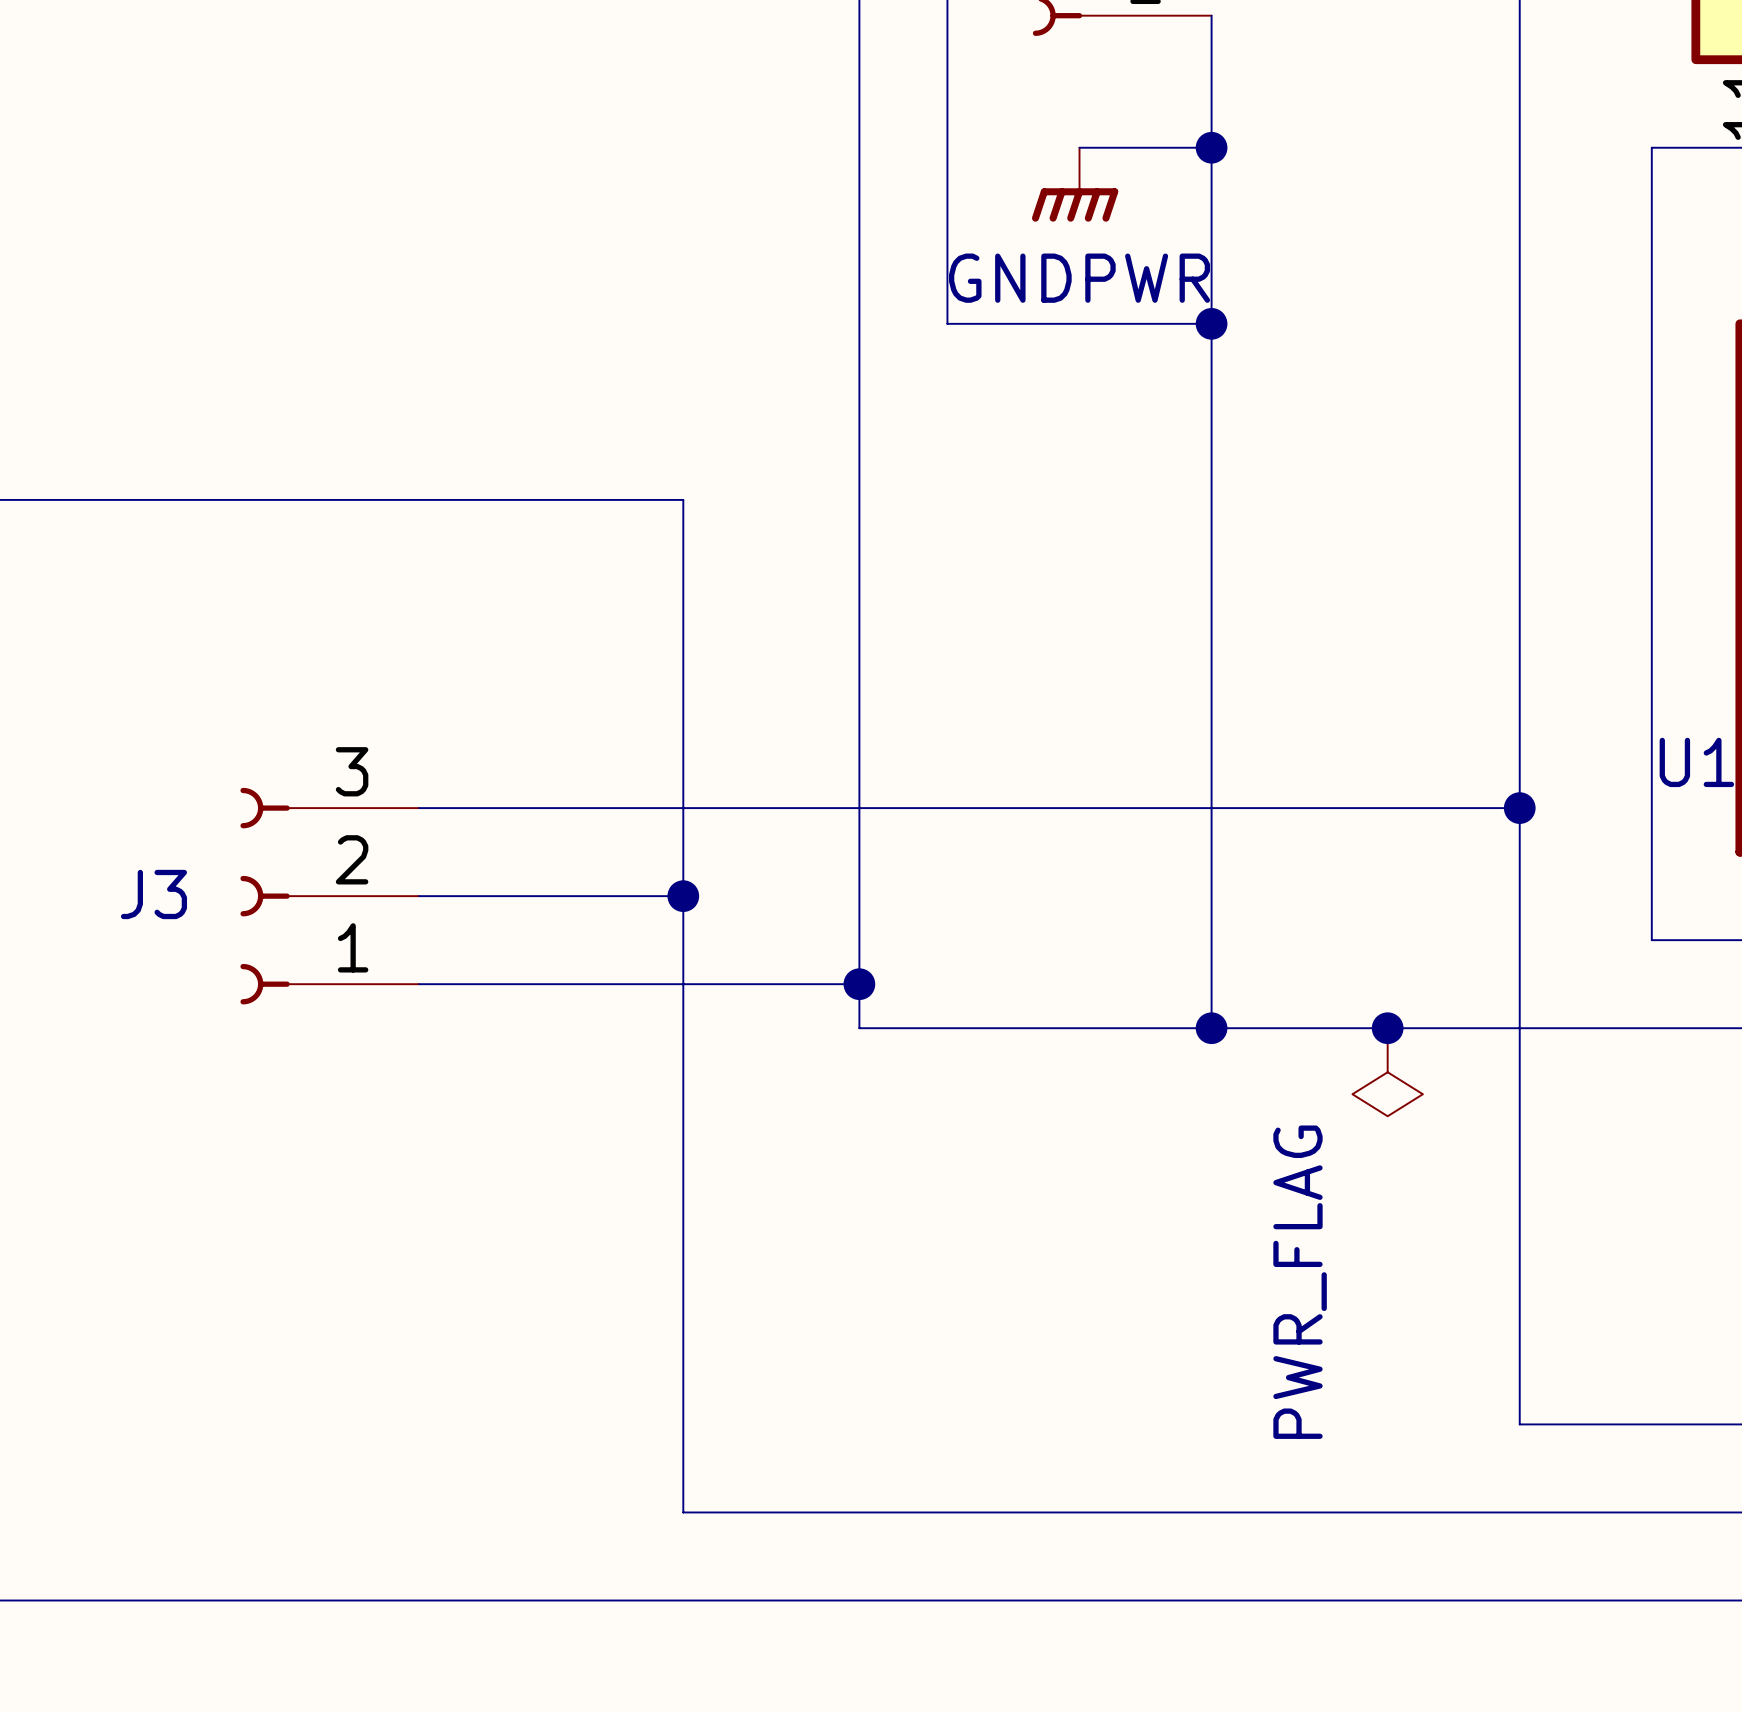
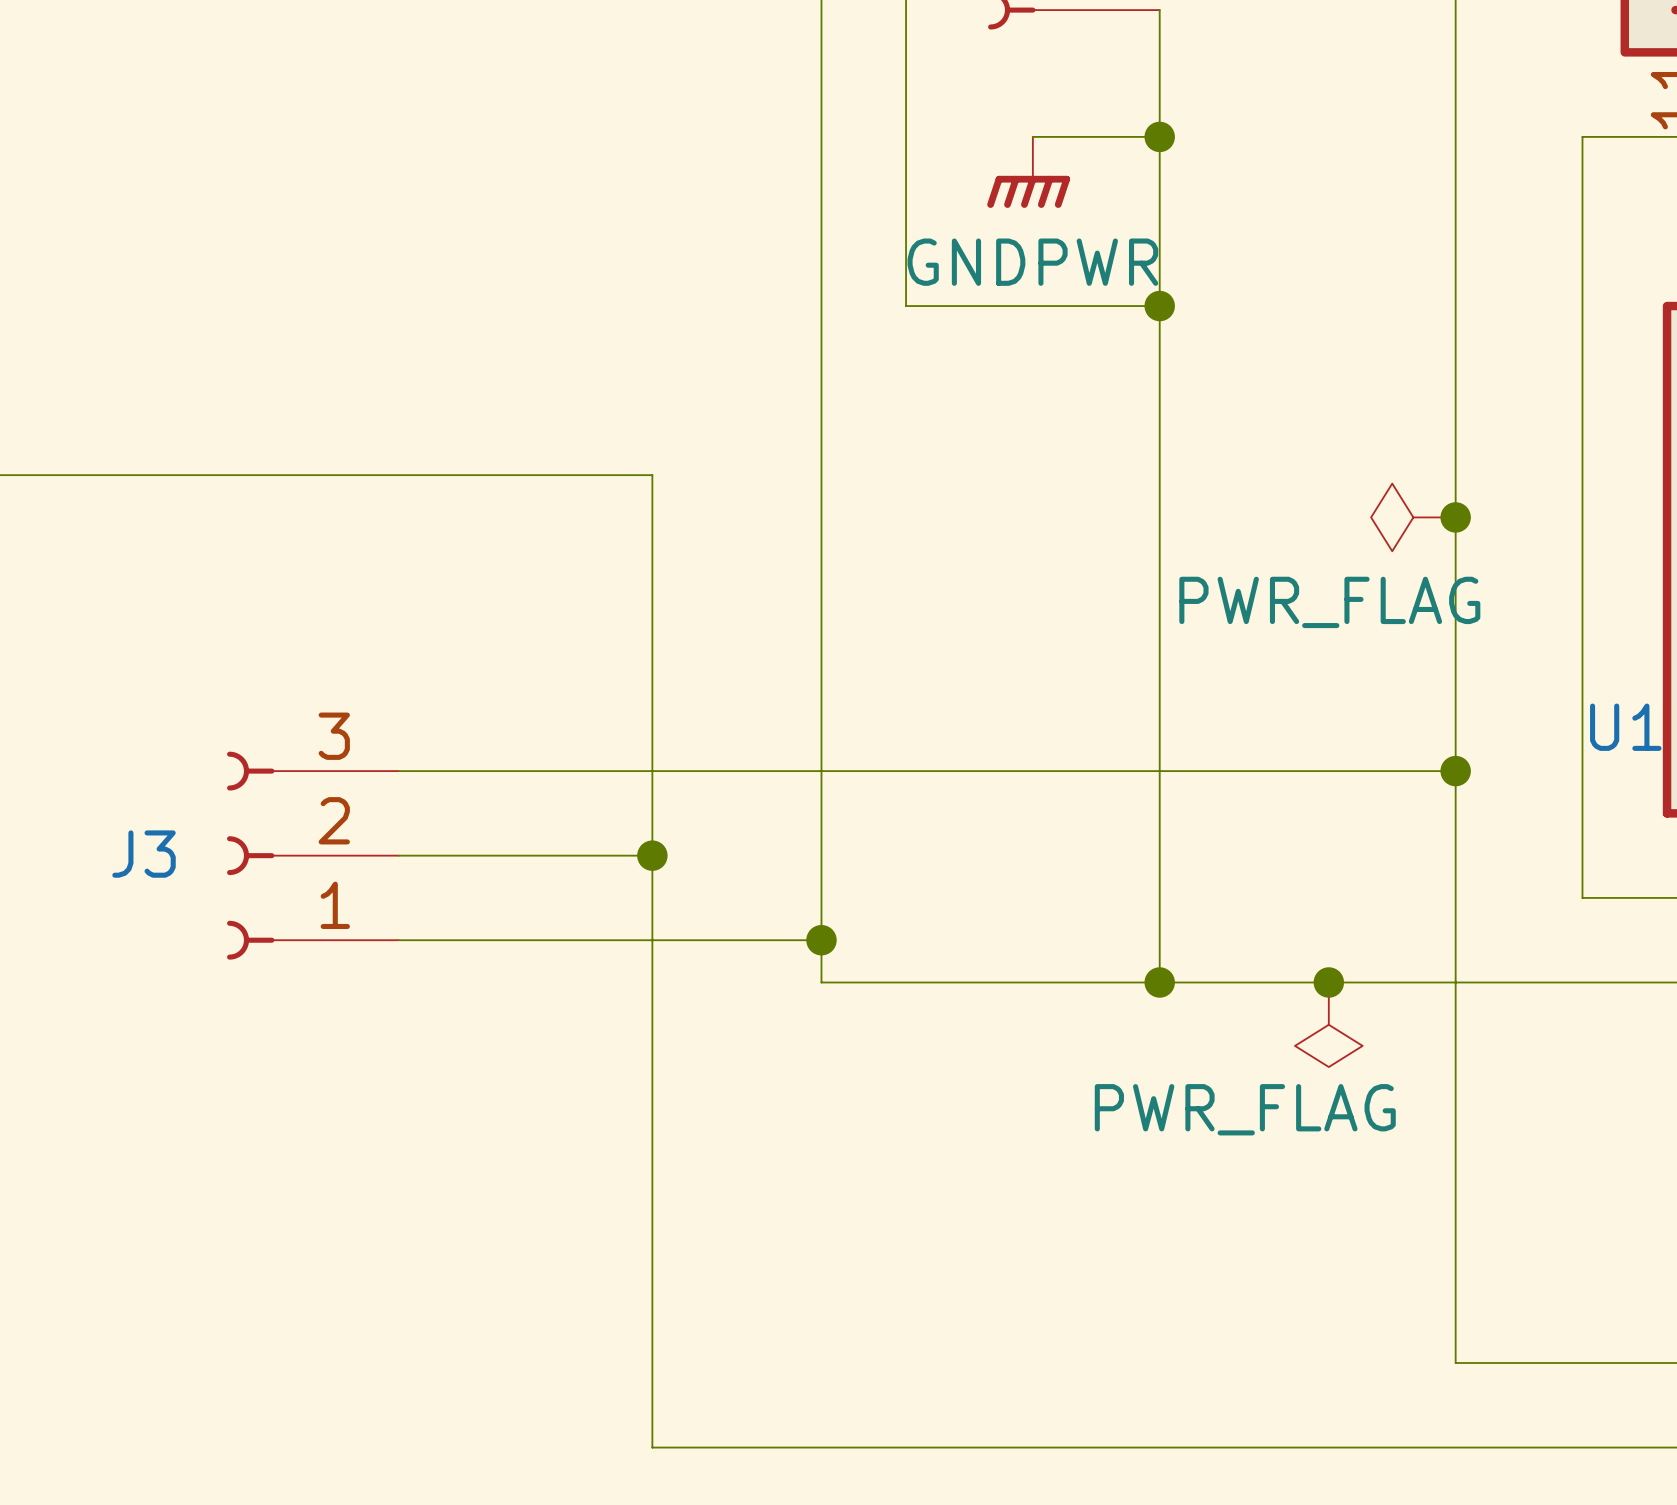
power symbol: none -> PWR_FLAG (1413, 517)
junction: none -> (1455, 517)
power symbol text rotation: 0° (1300, 1282) -> 90° clockwise (1245, 1109)

